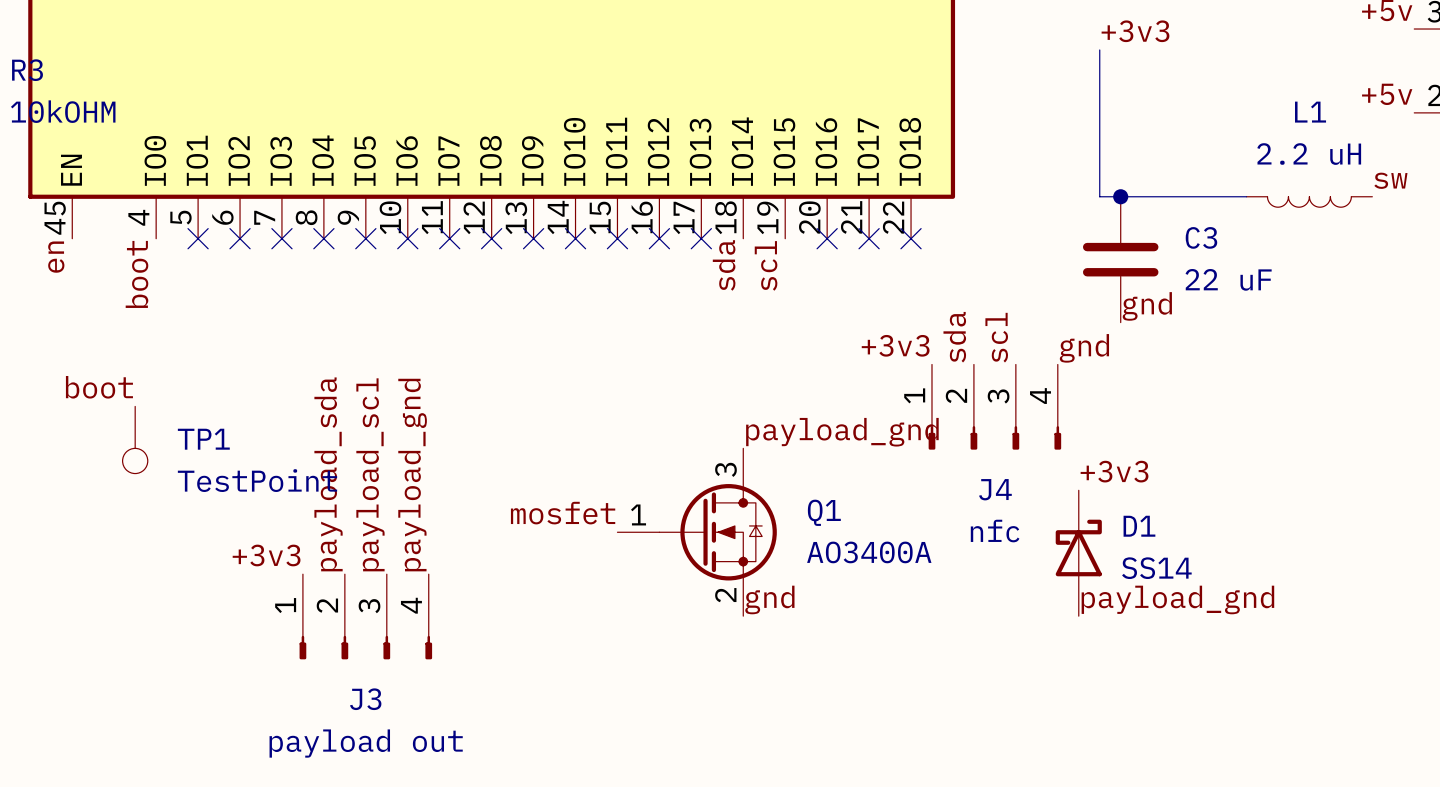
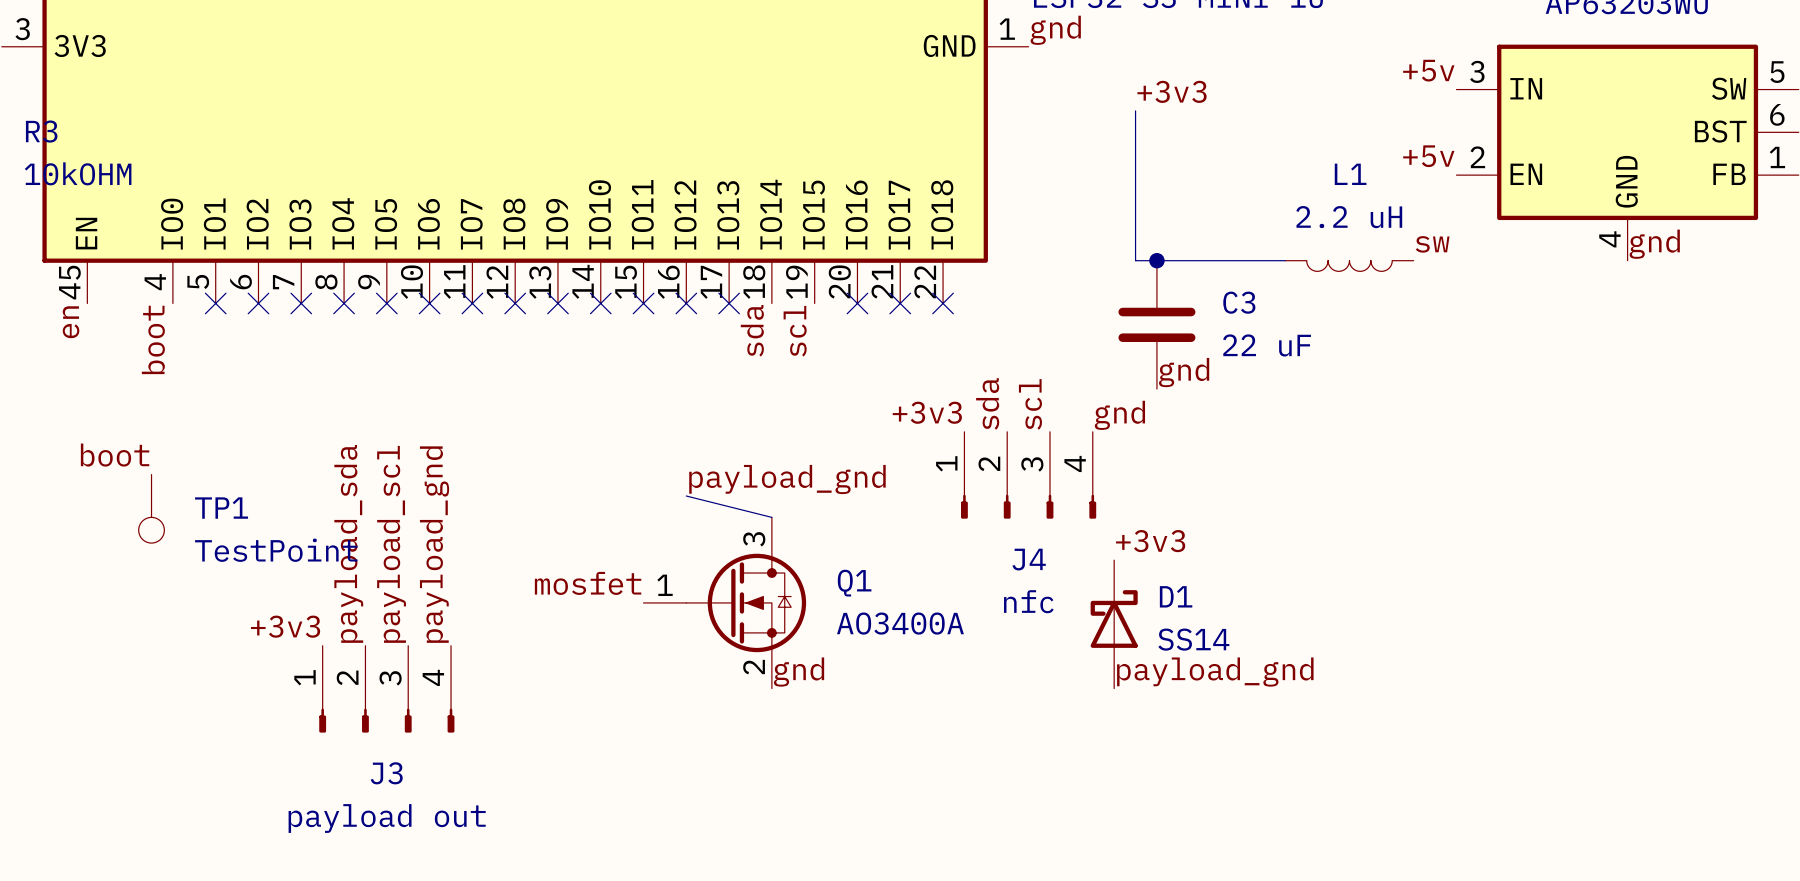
wire: none -> (686, 496) (771, 517)
label position: payload_gnd (842, 432) -> payload_gnd (787, 479)

